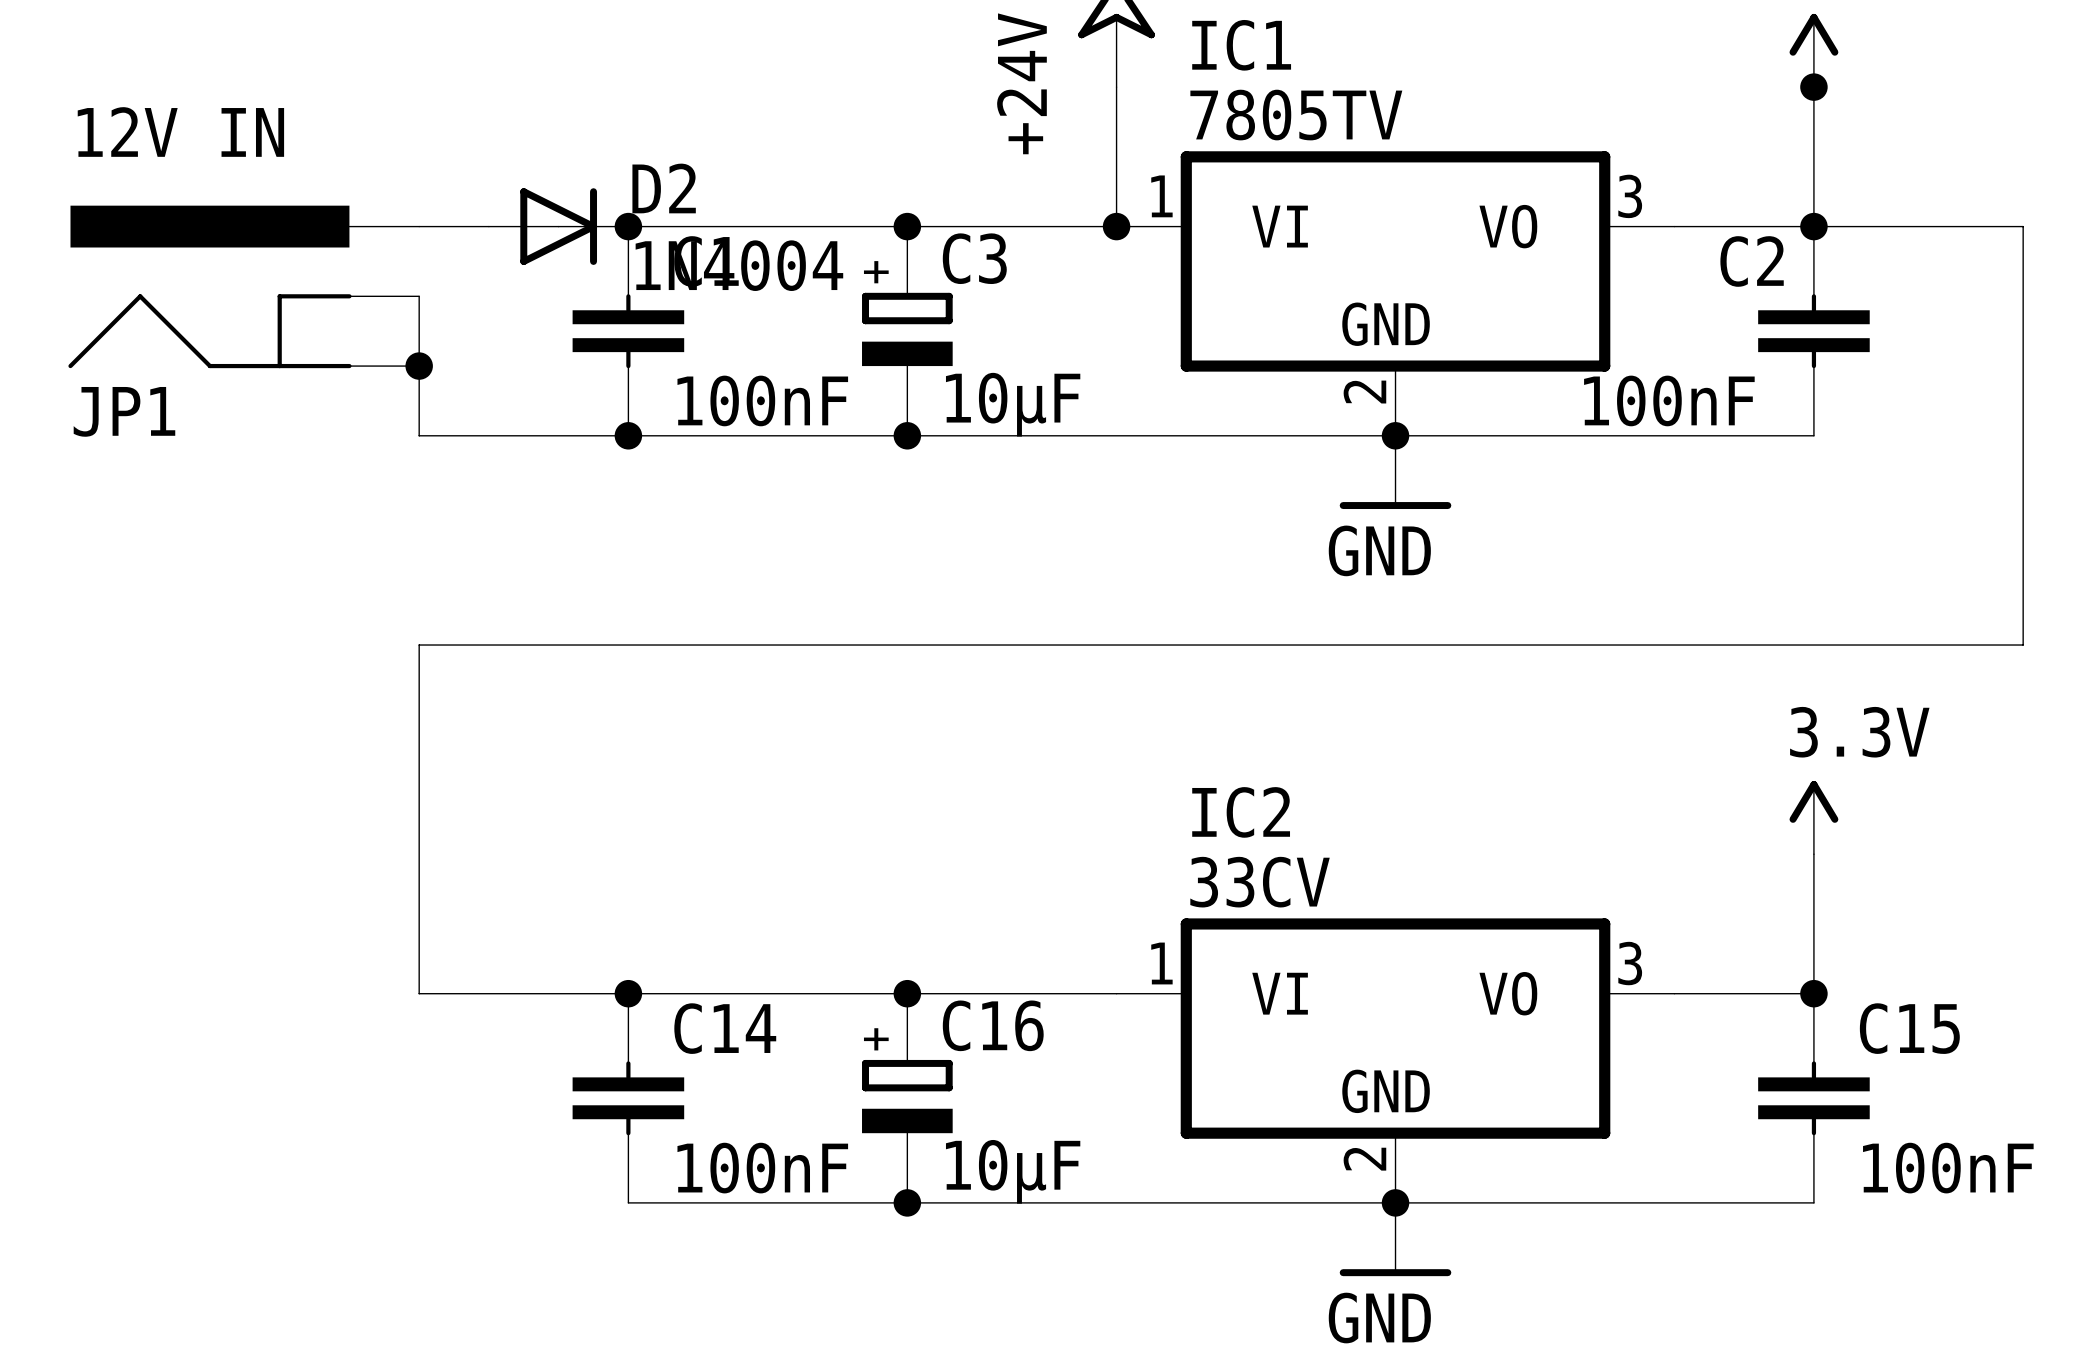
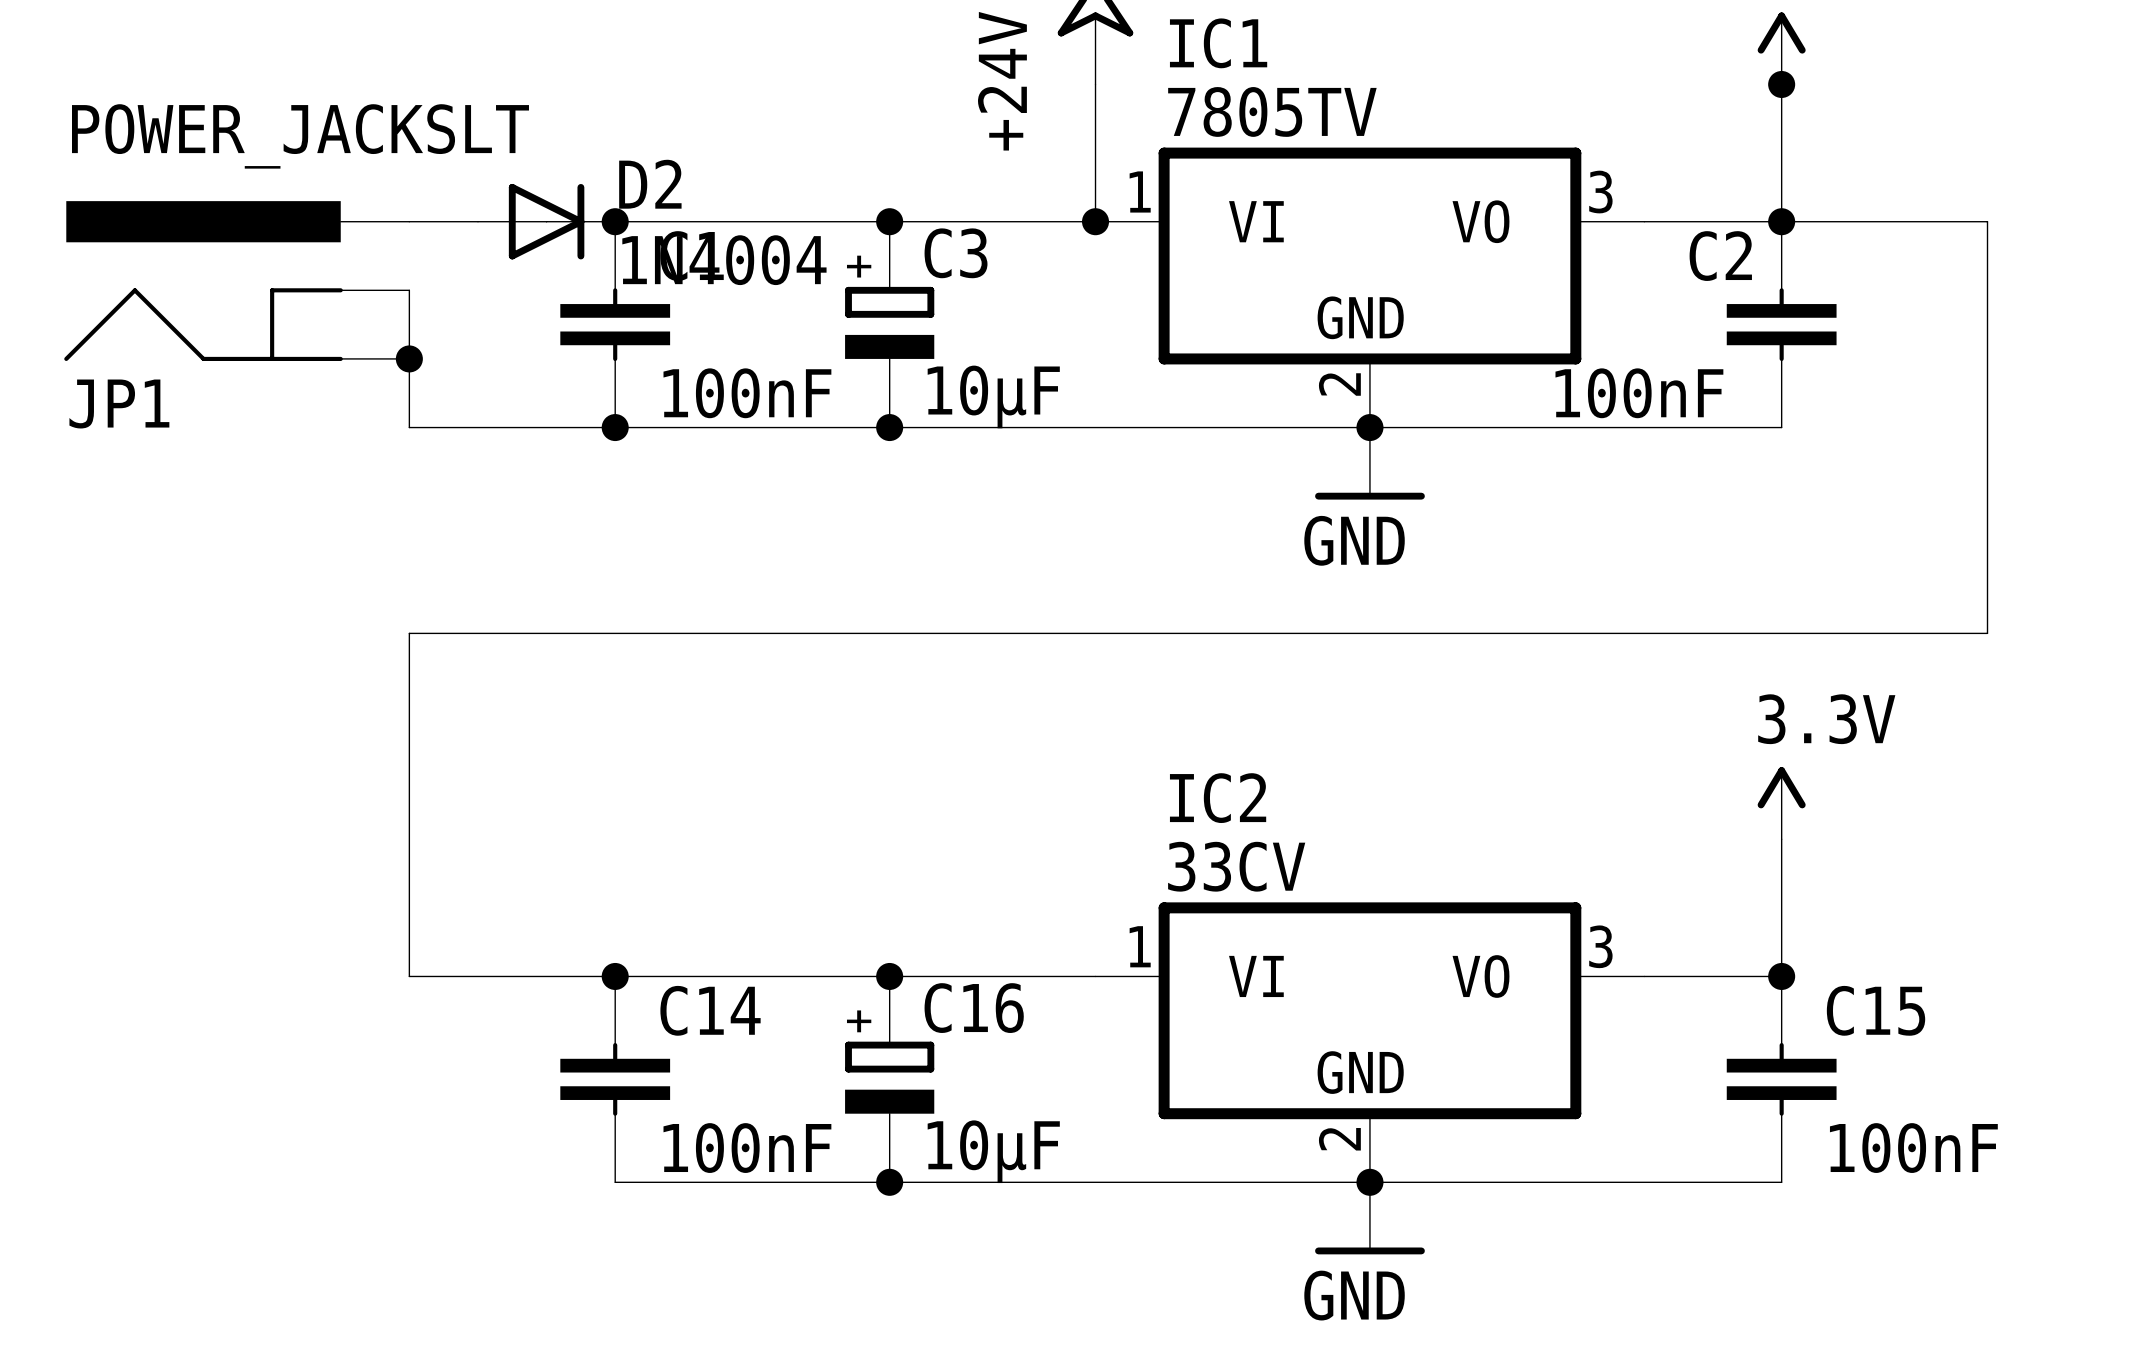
JP1 value: 12V IN (180, 131) -> POWER_JACKSLT (300, 136)

